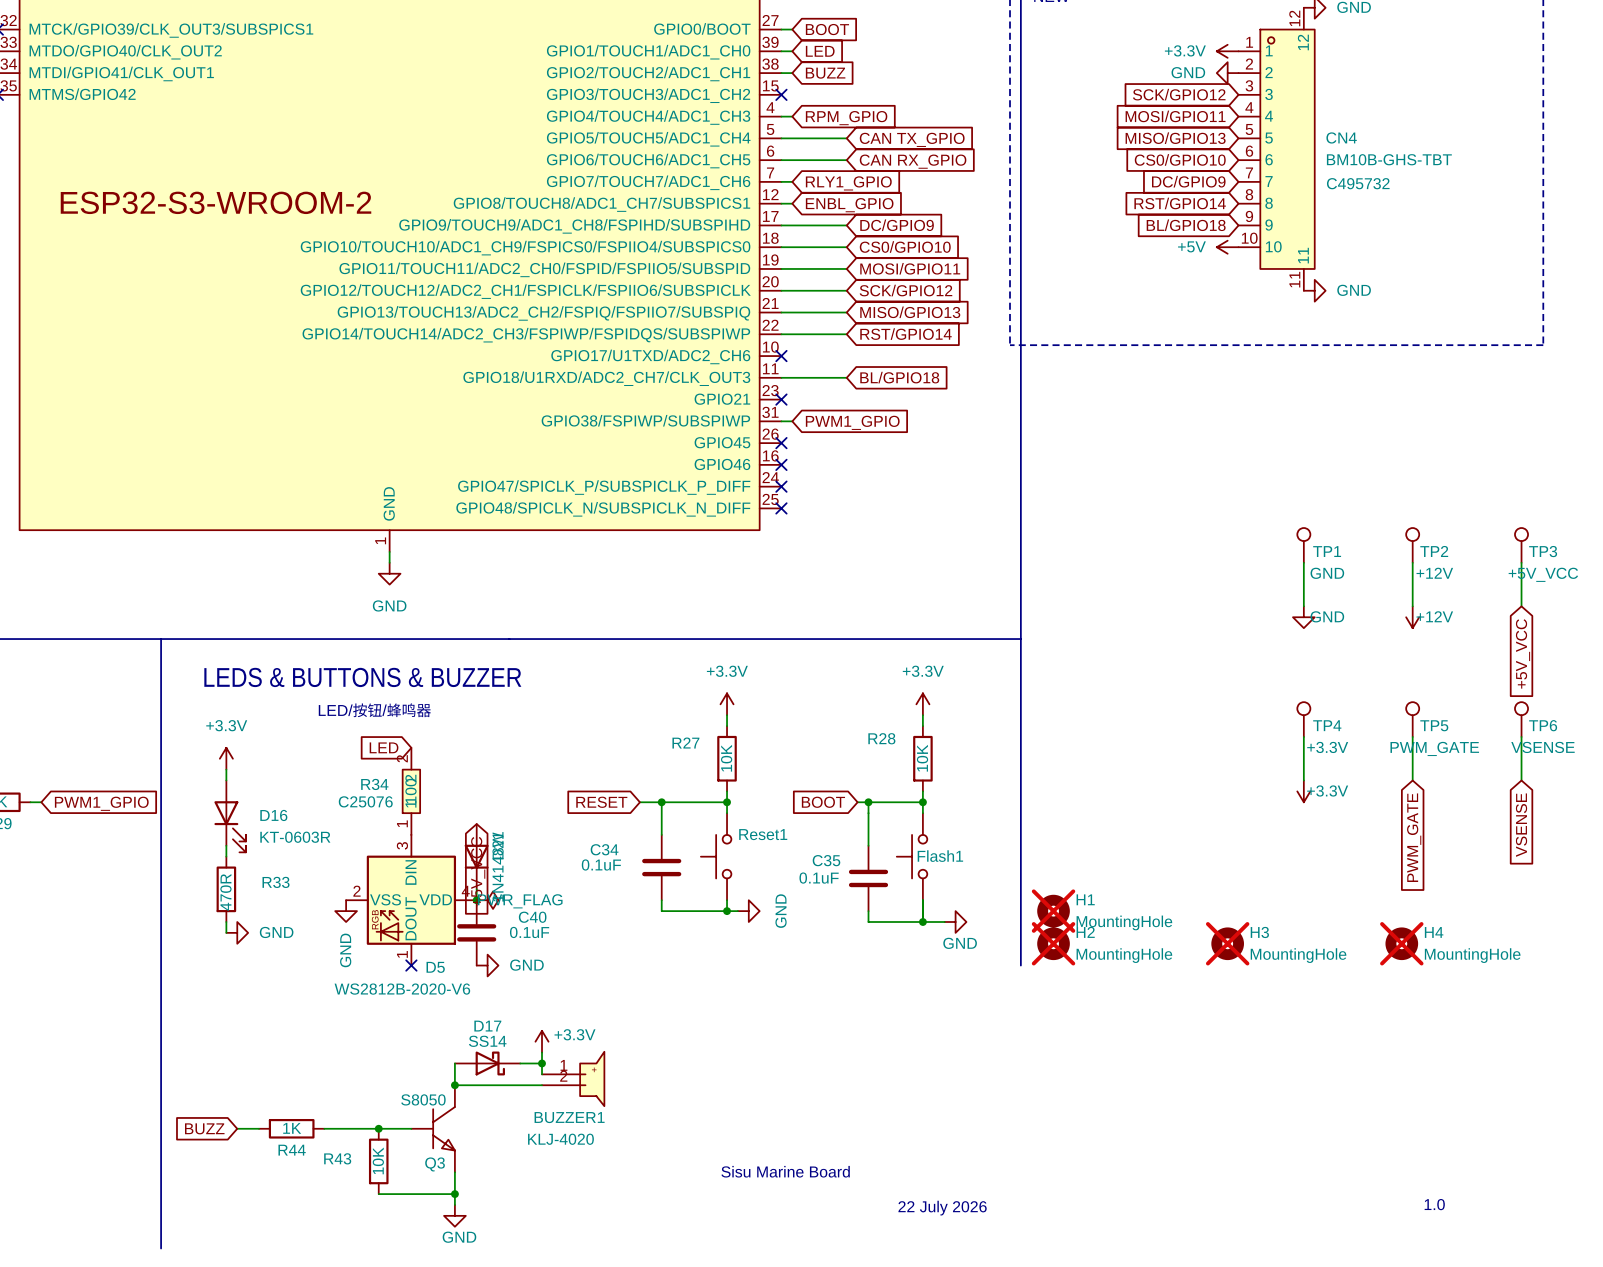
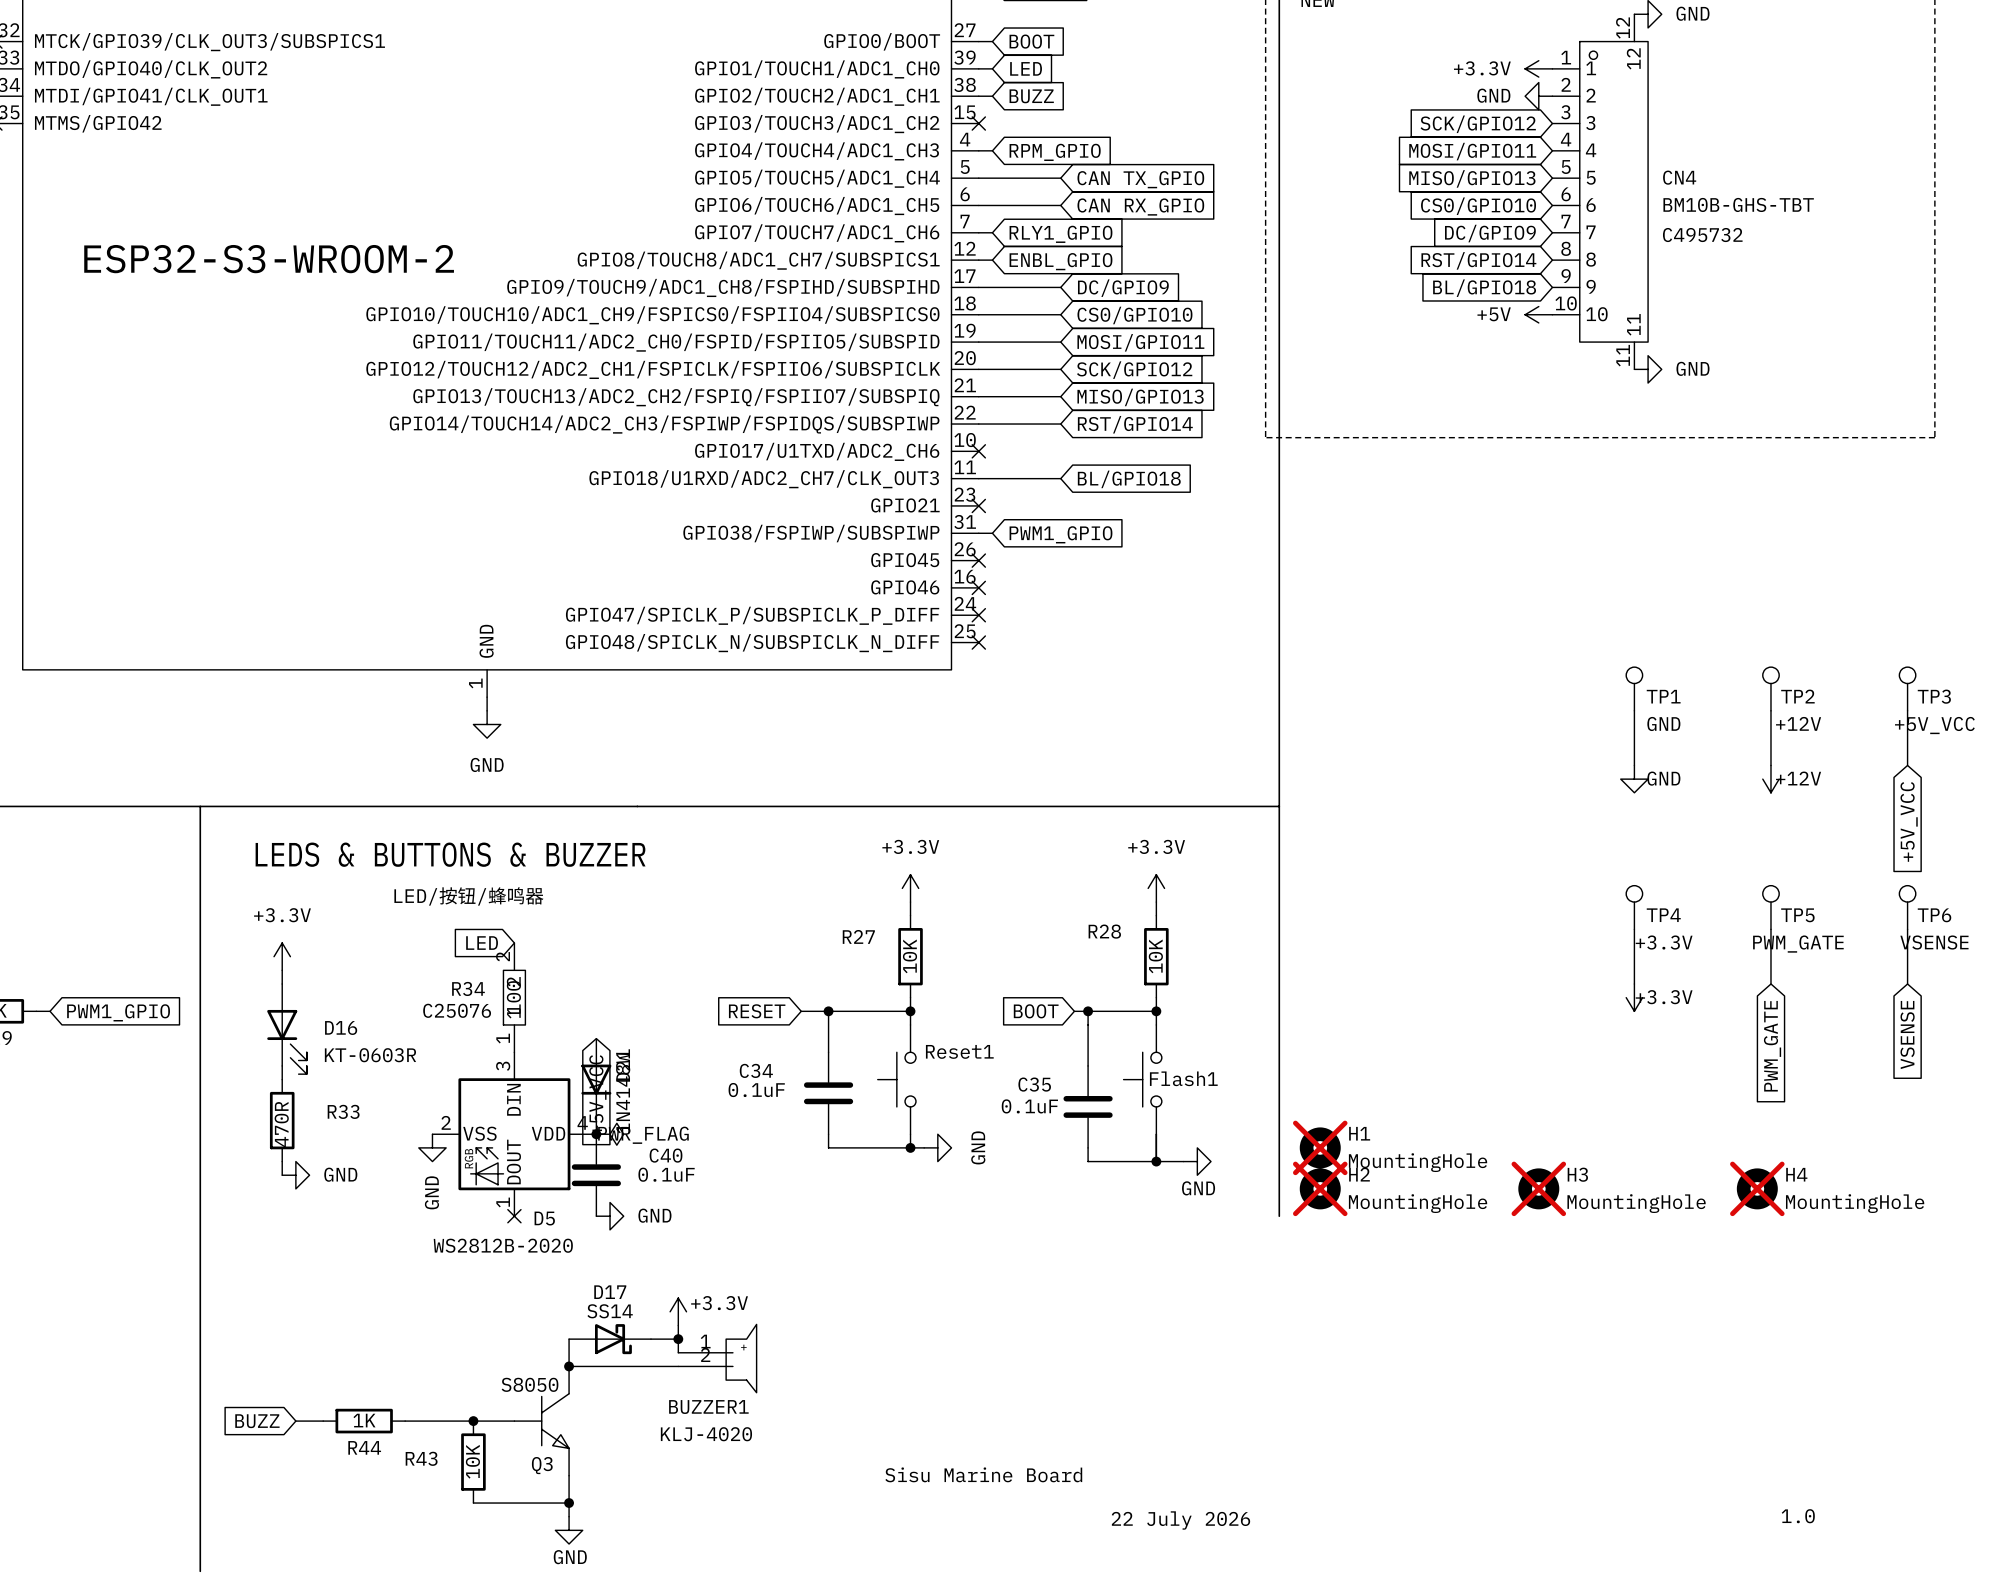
D5 value: WS2812B-2020-V6 (402, 989) -> WS2812B-2020 (503, 1245)

